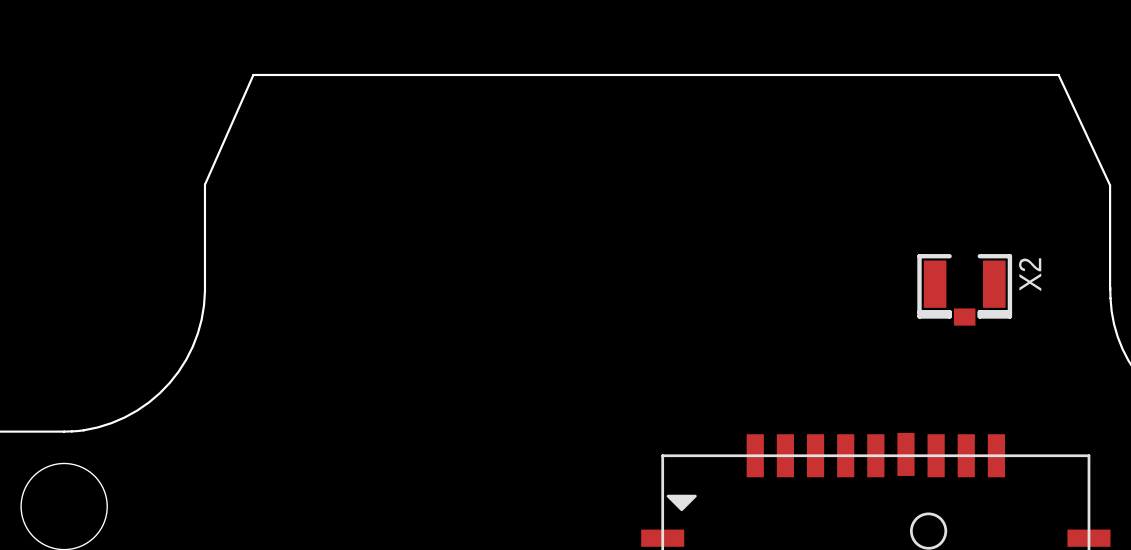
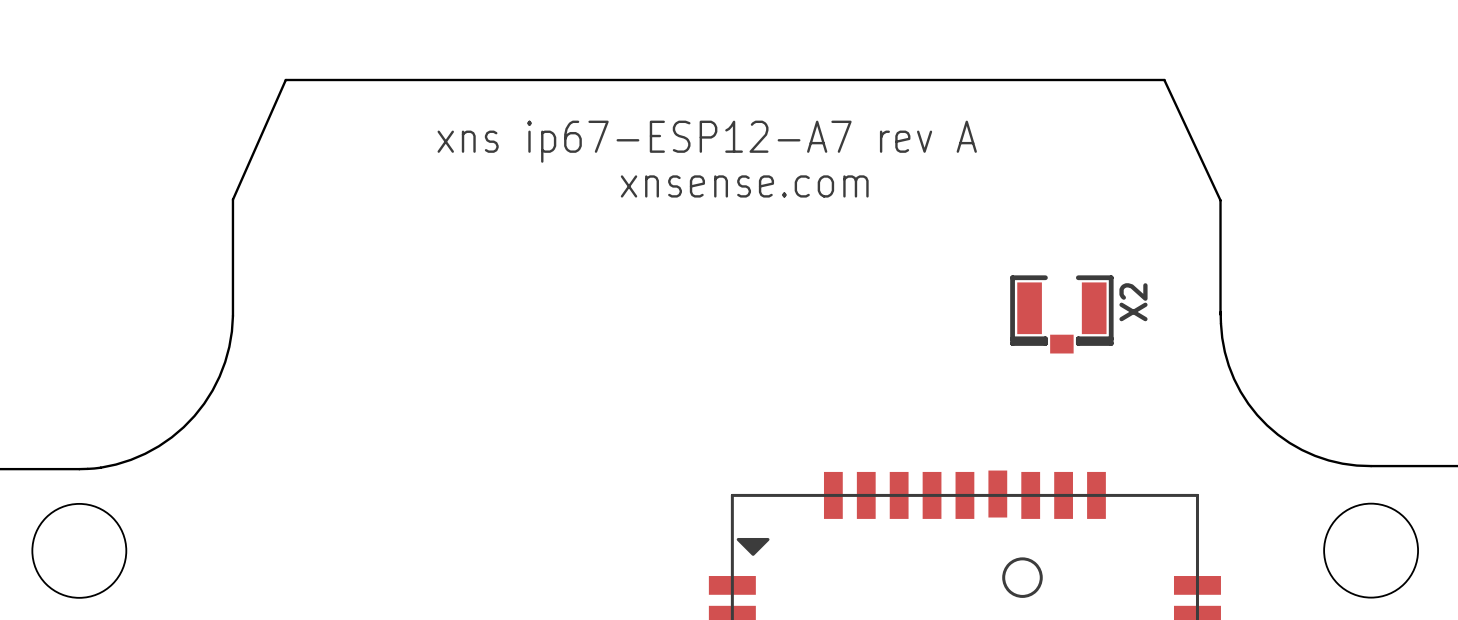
text: none -> xns ip67-ESP12-A7 rev A (707, 141)
text: none -> xnsense.com (744, 186)

